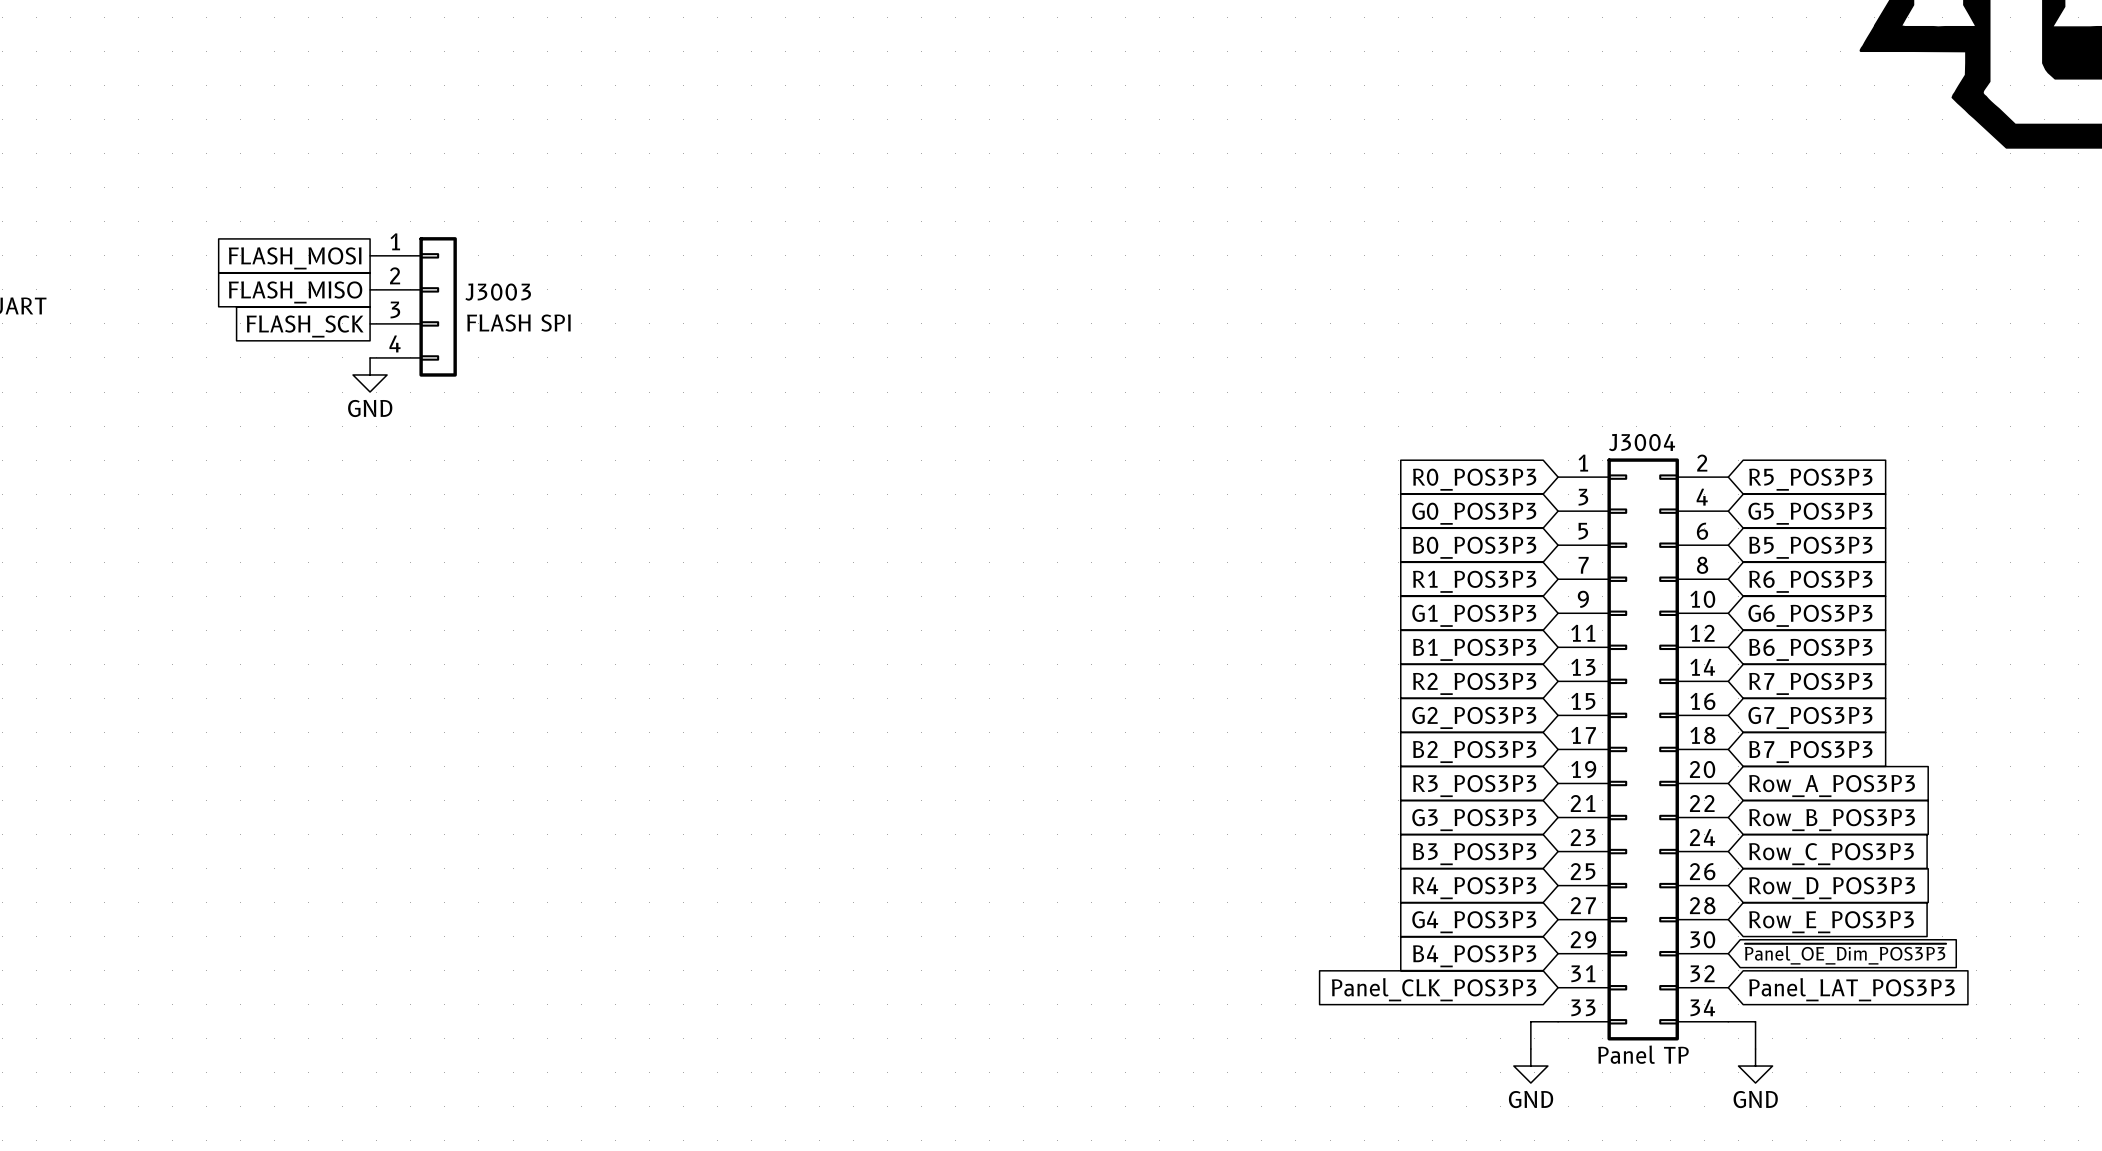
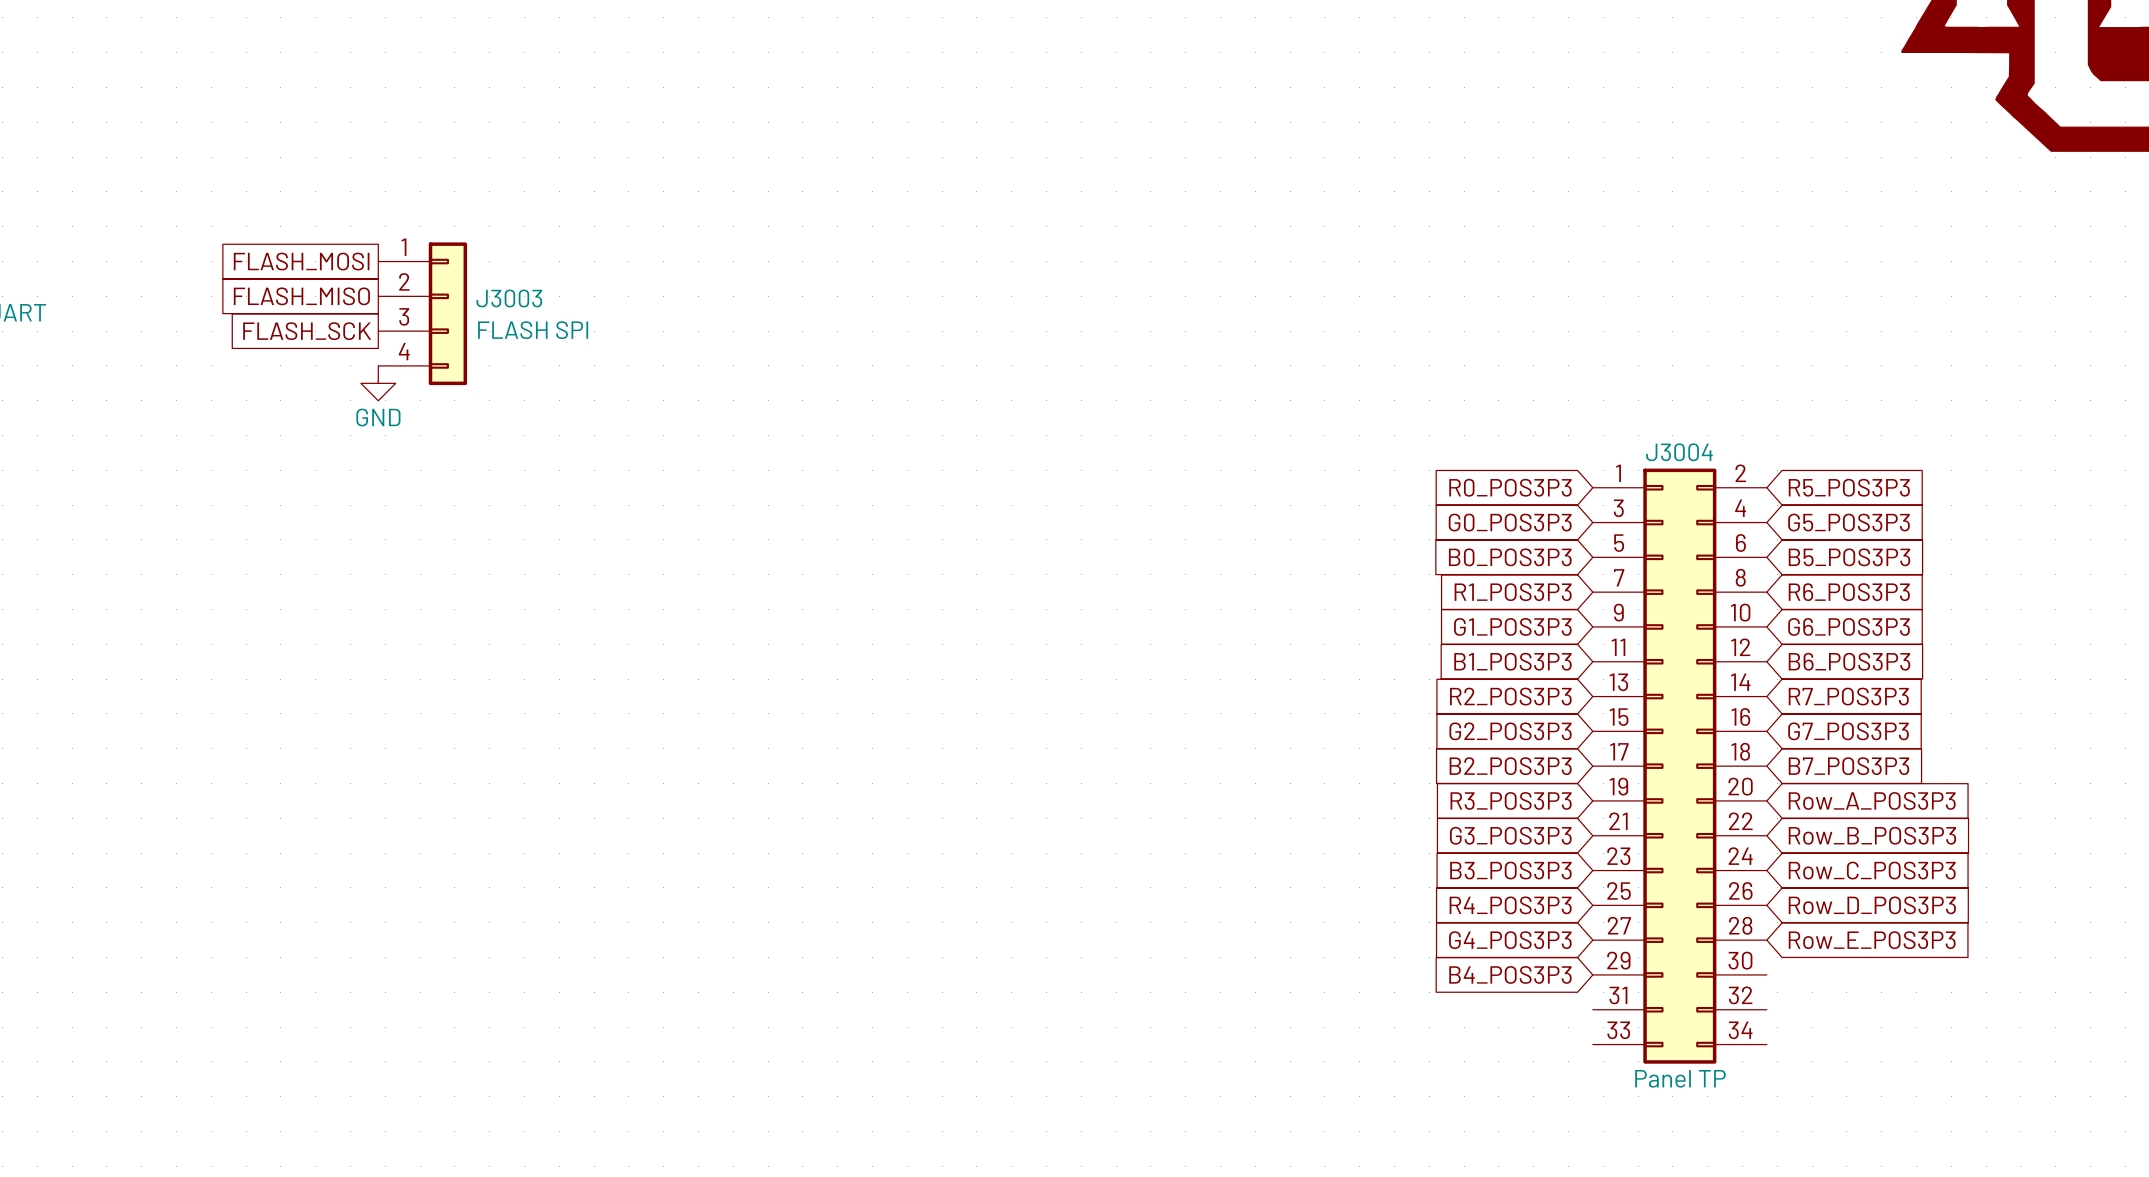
global label: ~{Panel_OE_Dim_POS3P3} (1845, 954) -> none
global label: Panel_CLK_POS3P3 (1434, 989) -> none
global label: Panel_LAT_POS3P3 (1851, 989) -> none
wire: (1558, 1021) (1530, 1021) (1530, 1049) -> none
wire: (1728, 1021) (1755, 1021) (1755, 1049) -> none
power symbol: GND (1530, 1066) -> none
power symbol: GND (1755, 1066) -> none

